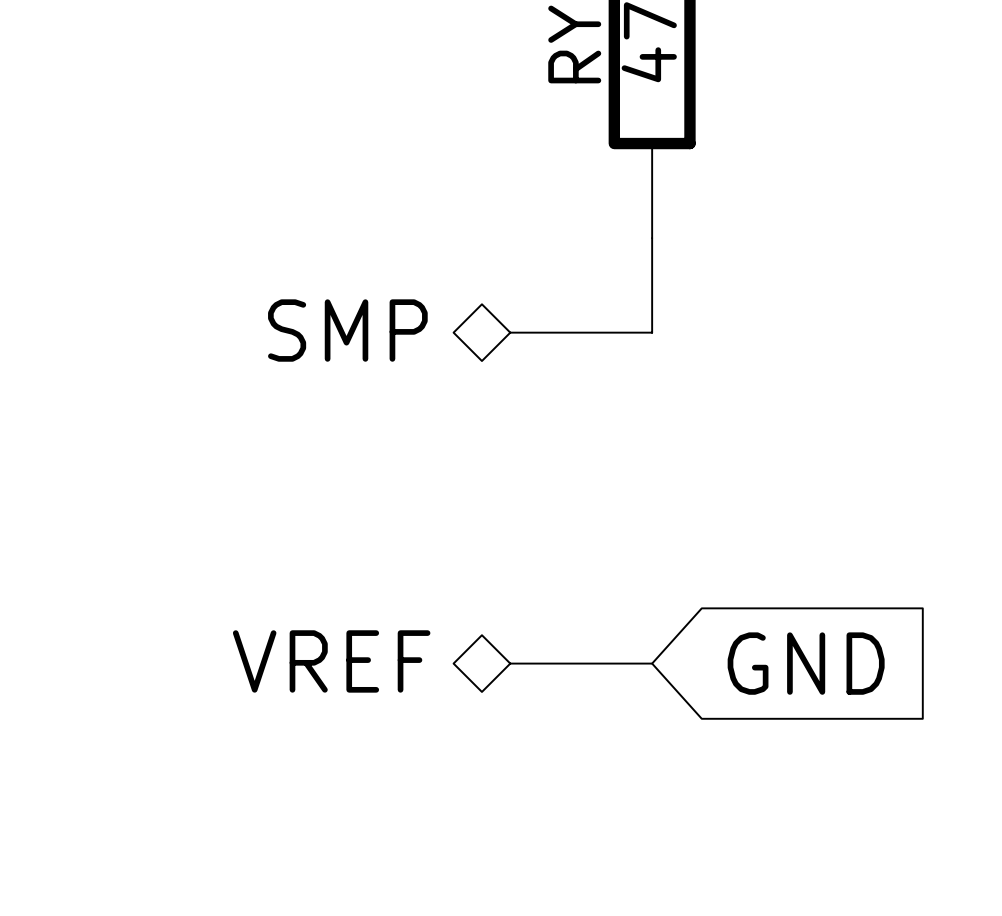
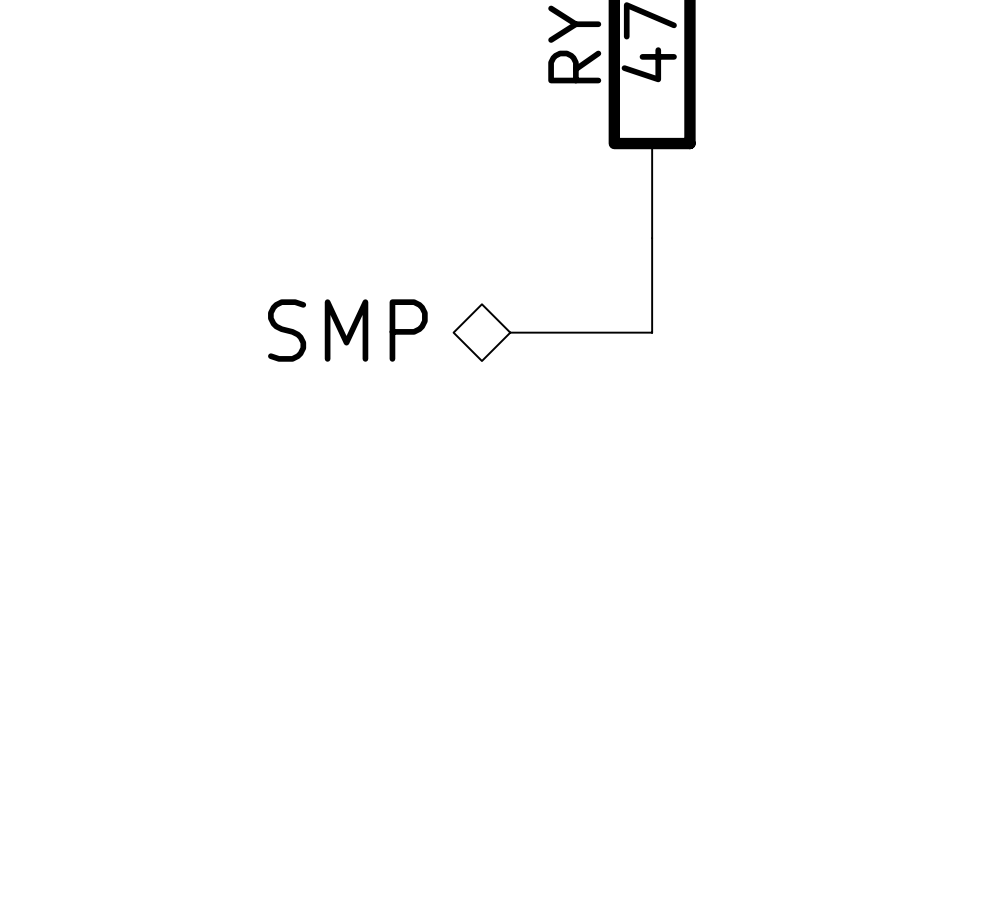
hierarchical label: VREF (331, 661) -> none
wire: (510, 663) (652, 663) -> none
global label: GND (806, 663) -> none

